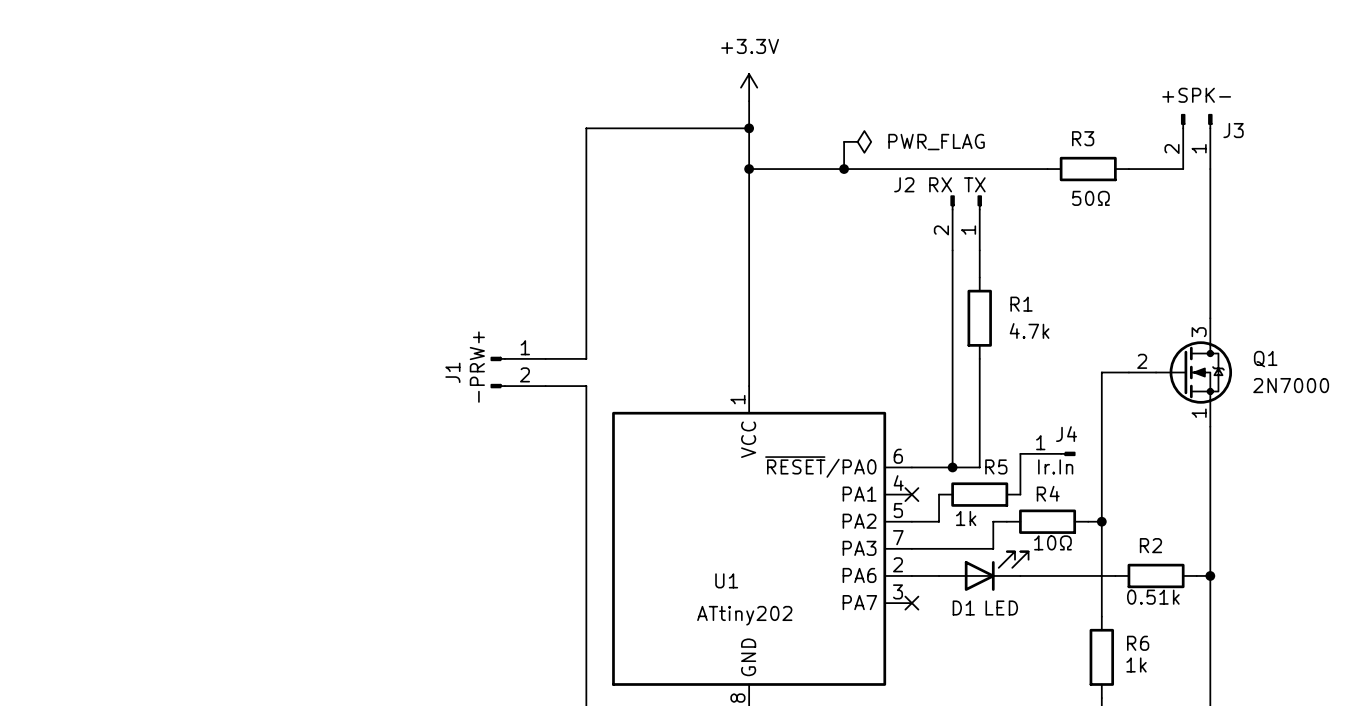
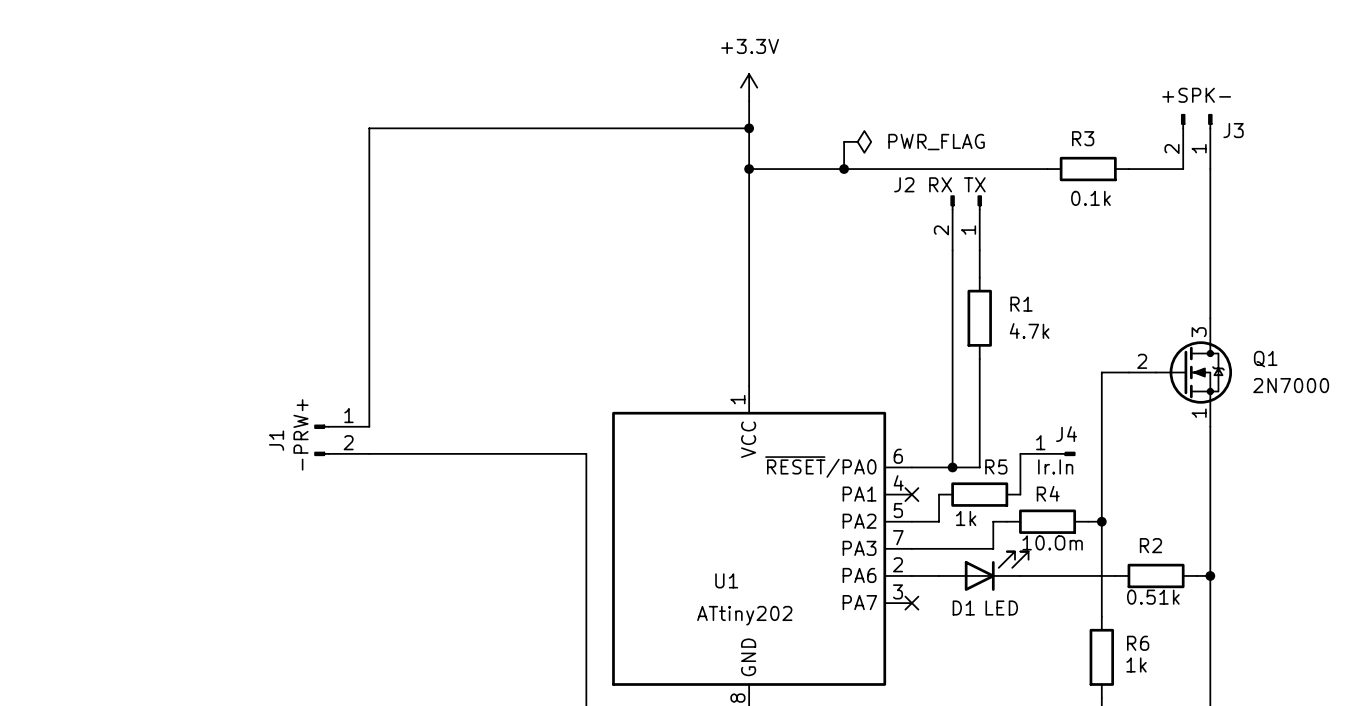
wire: (586, 128) (586, 358) (545, 358) -> (586, 128) (369, 128) (369, 426)
R3 value: 50Ω (1090, 198) -> 0.1k (1090, 198)
J1 position: (518, 372) -> (341, 440)
wire: (545, 386) (586, 386) (586, 453) -> (369, 453) (586, 453)
R4 value: 10Ω (1052, 542) -> 10.Om (1052, 542)

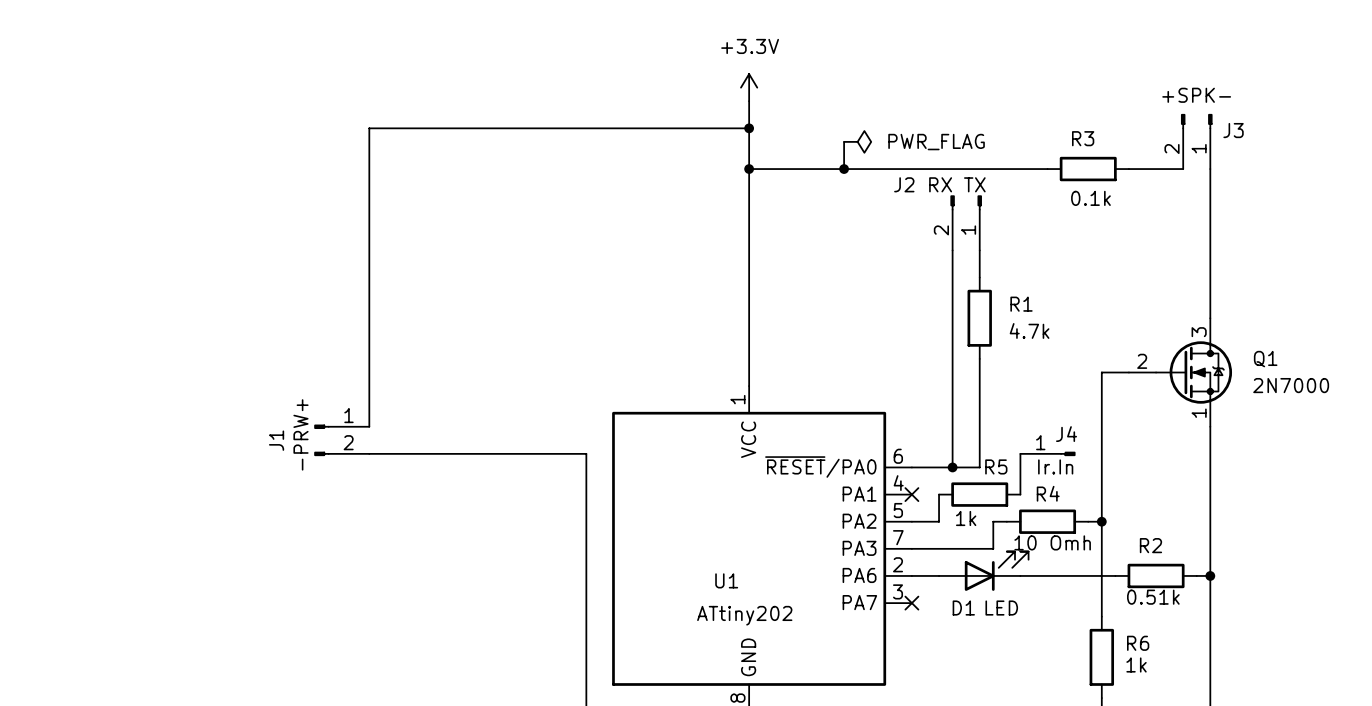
R4 value: 10.Om (1052, 542) -> 10 Omh (1052, 542)

